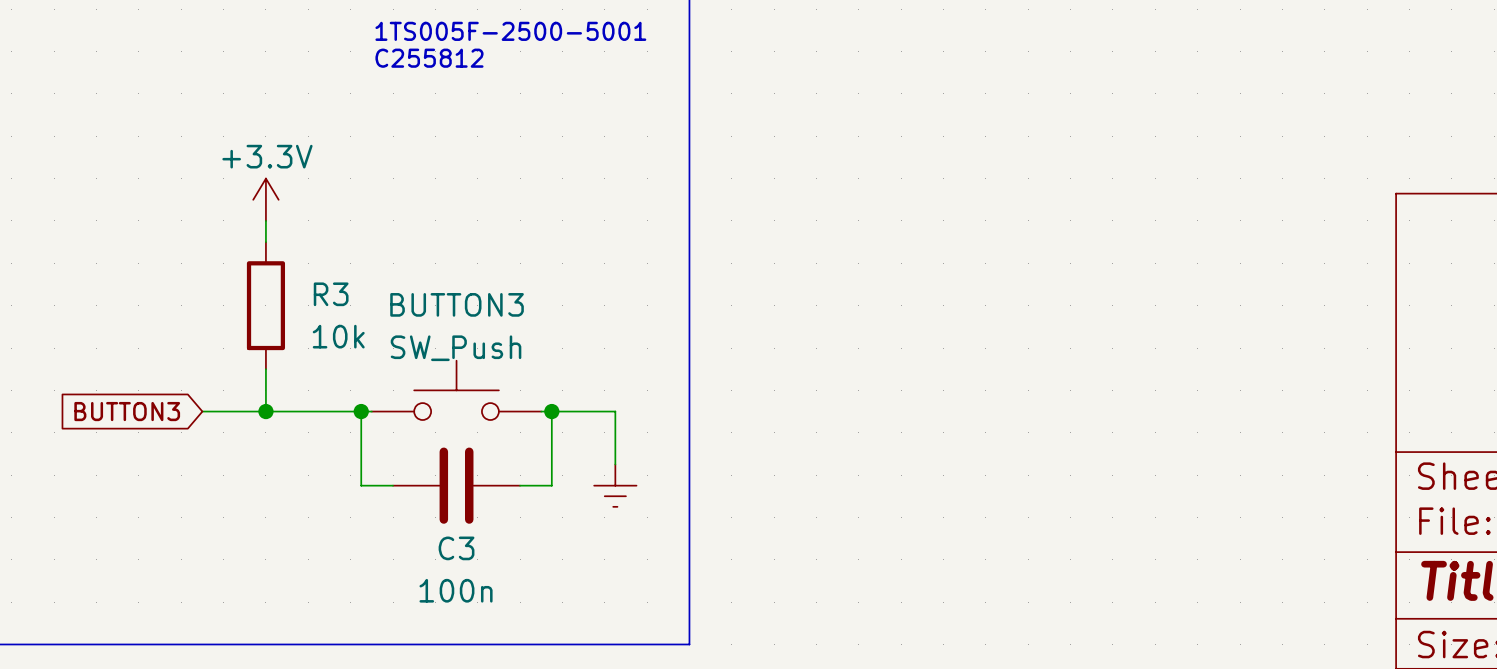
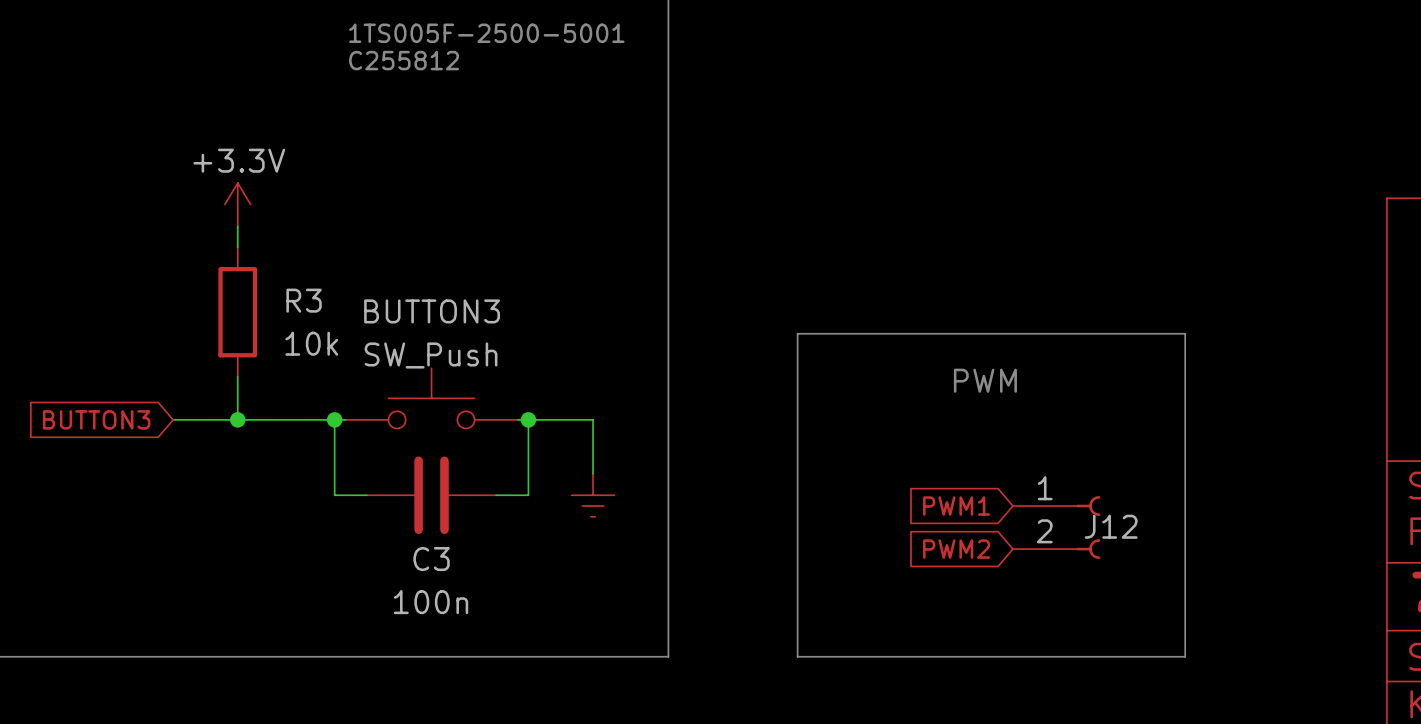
bus: none -> (797, 333) (1185, 333) (1185, 656) (797, 656) (797, 333)
text: none -> PWM (985, 380)
global label: none -> PWM1 (956, 506)
J12: none -> (1056, 527)
global label: none -> PWM2 (956, 549)

